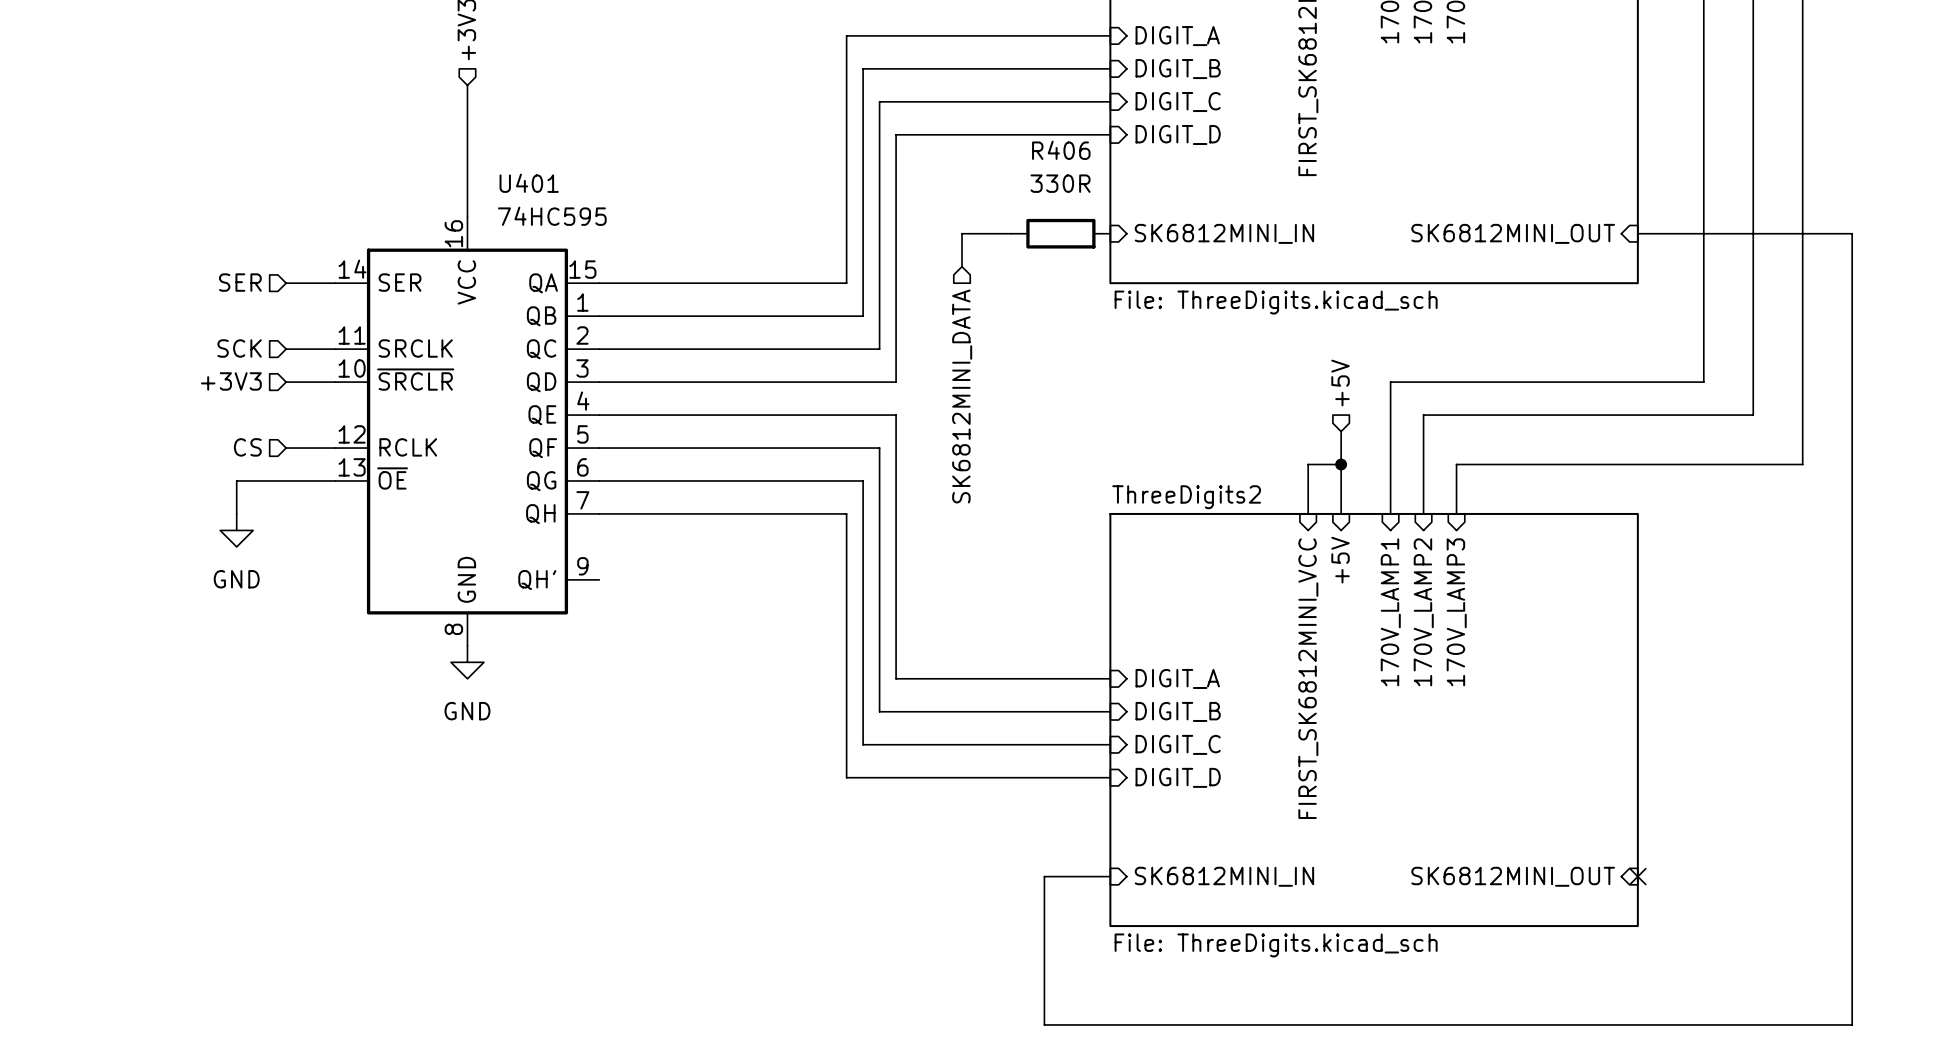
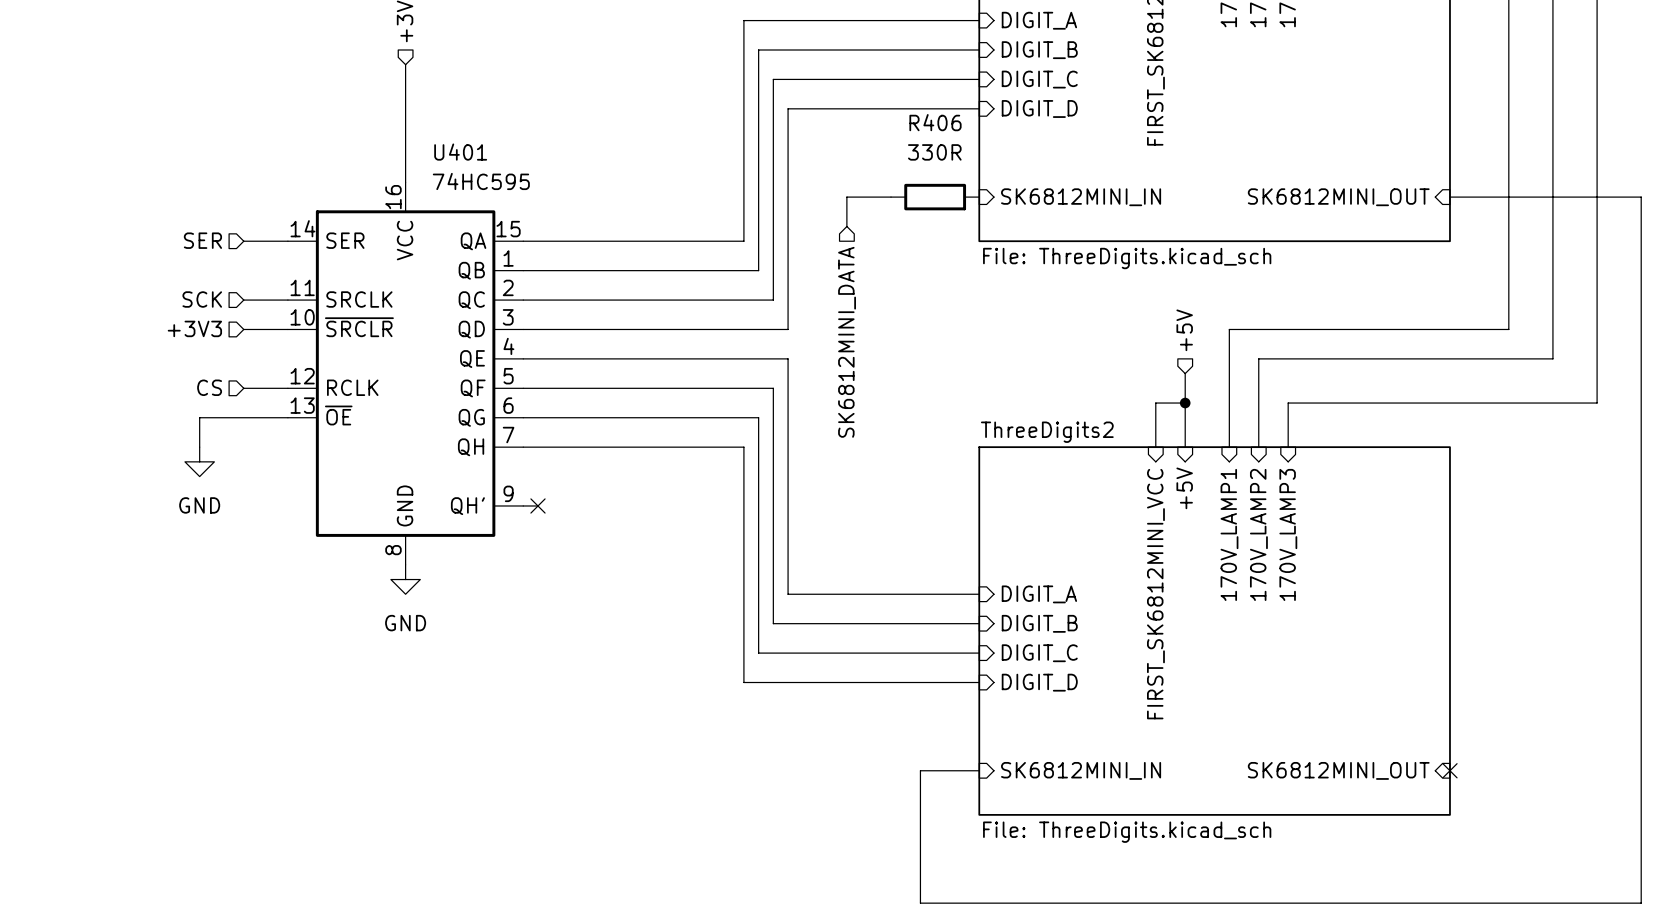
wire: none -> (523, 505) (537, 505)
no-connect mark: none -> (537, 505)

